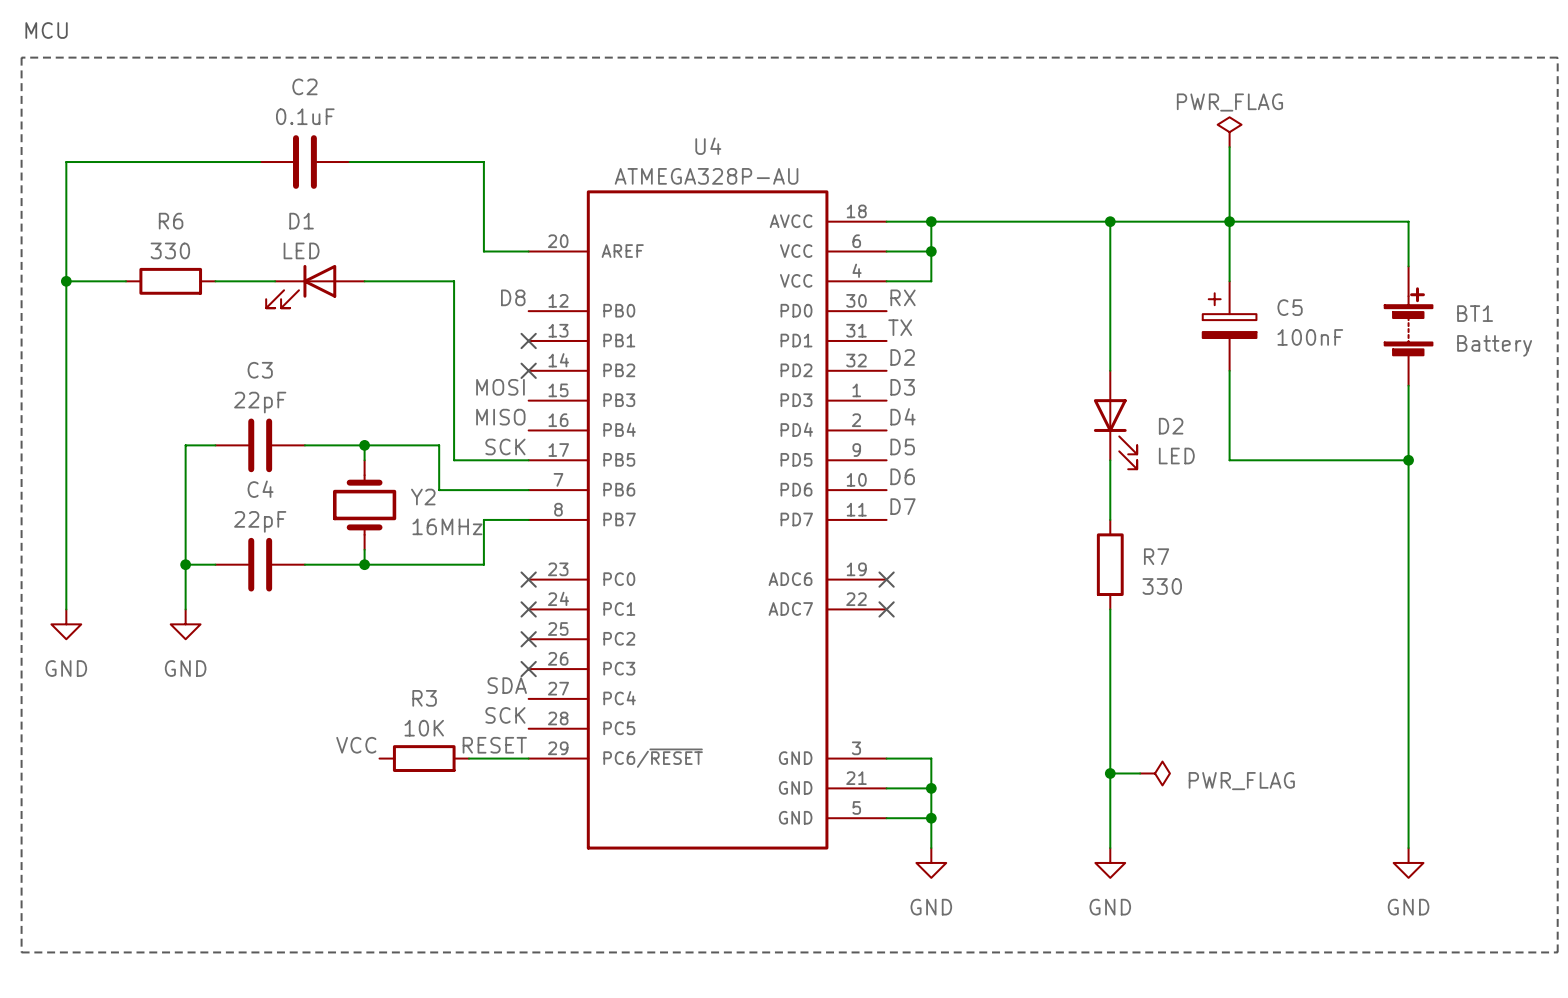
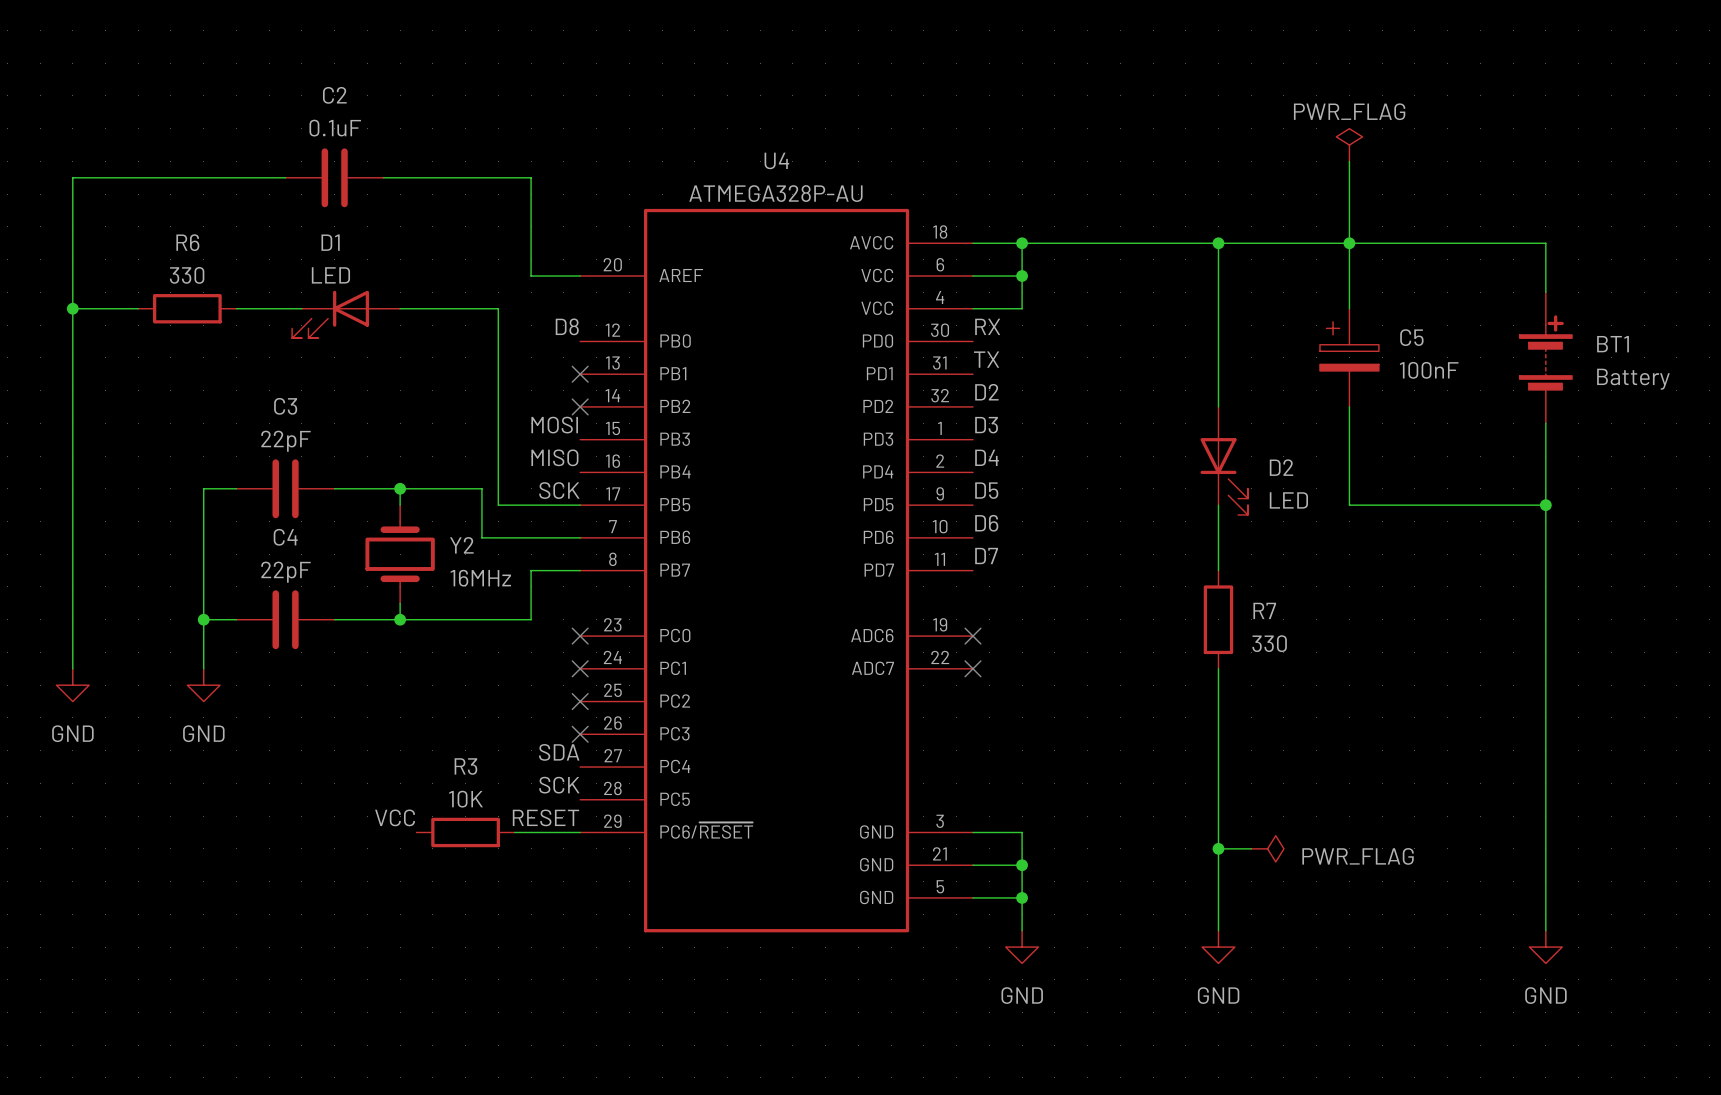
text: MCU (46, 30) -> none
line: (21, 57) (21, 952) (1557, 952) (1557, 57) (21, 57) -> none

